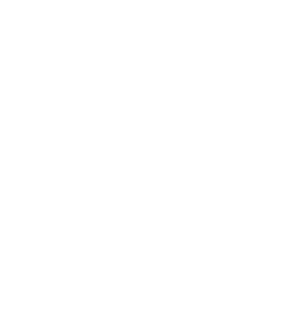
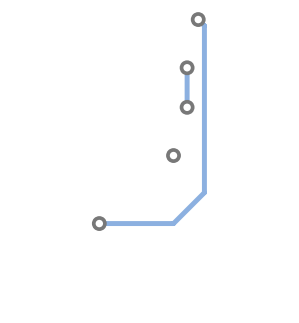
track: none -> (198, 19) (204, 25) (204, 192) (173, 223) (99, 223)
via: none -> (198, 19)
track: none -> (187, 67) (187, 107)
via: none -> (187, 67)
via: none -> (187, 107)
via: none -> (173, 155)
via: none -> (99, 223)

